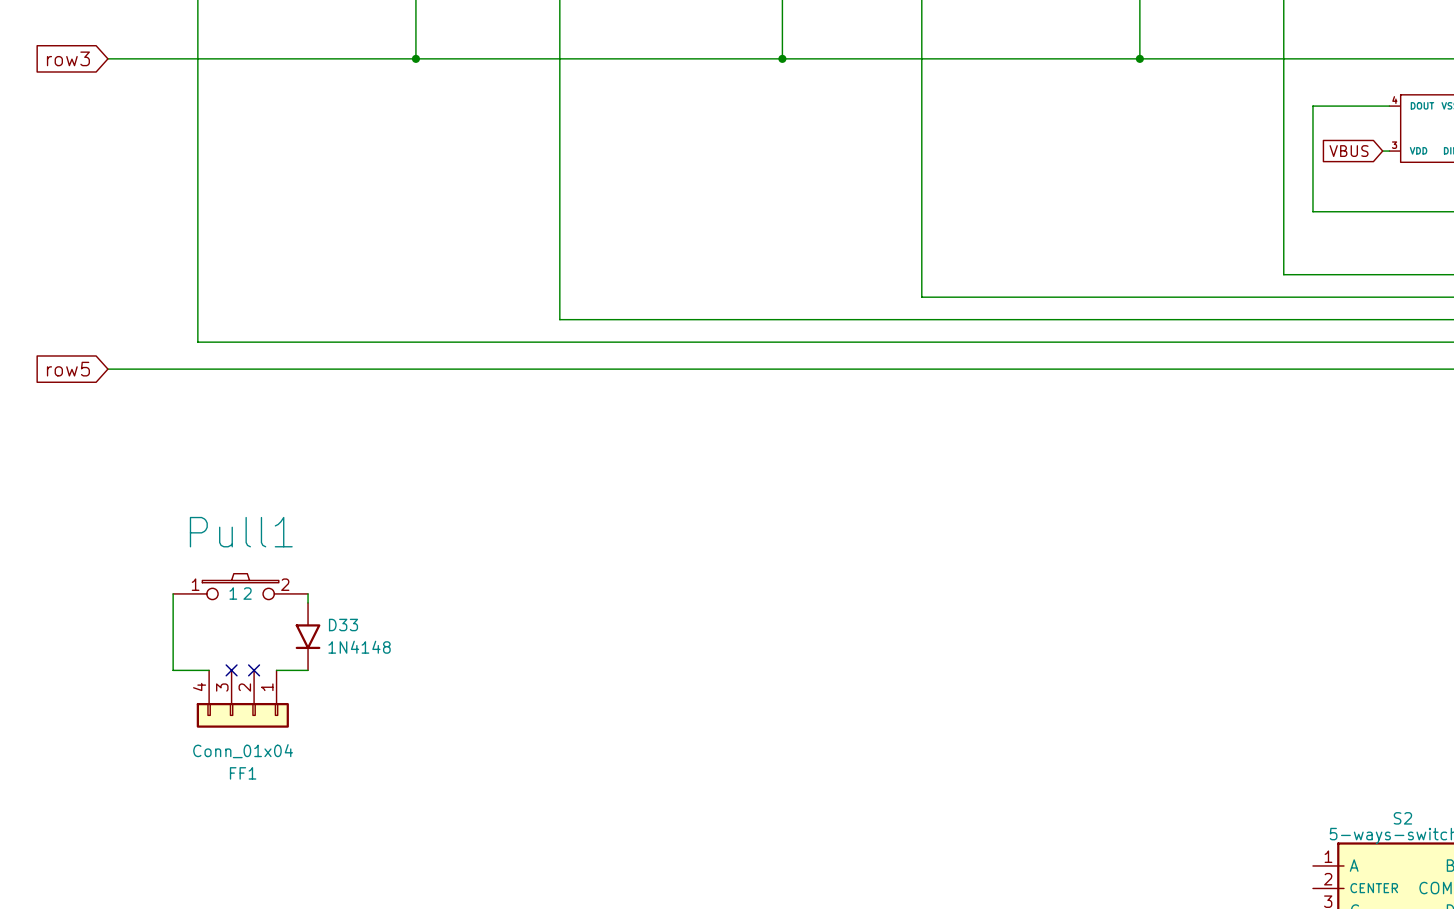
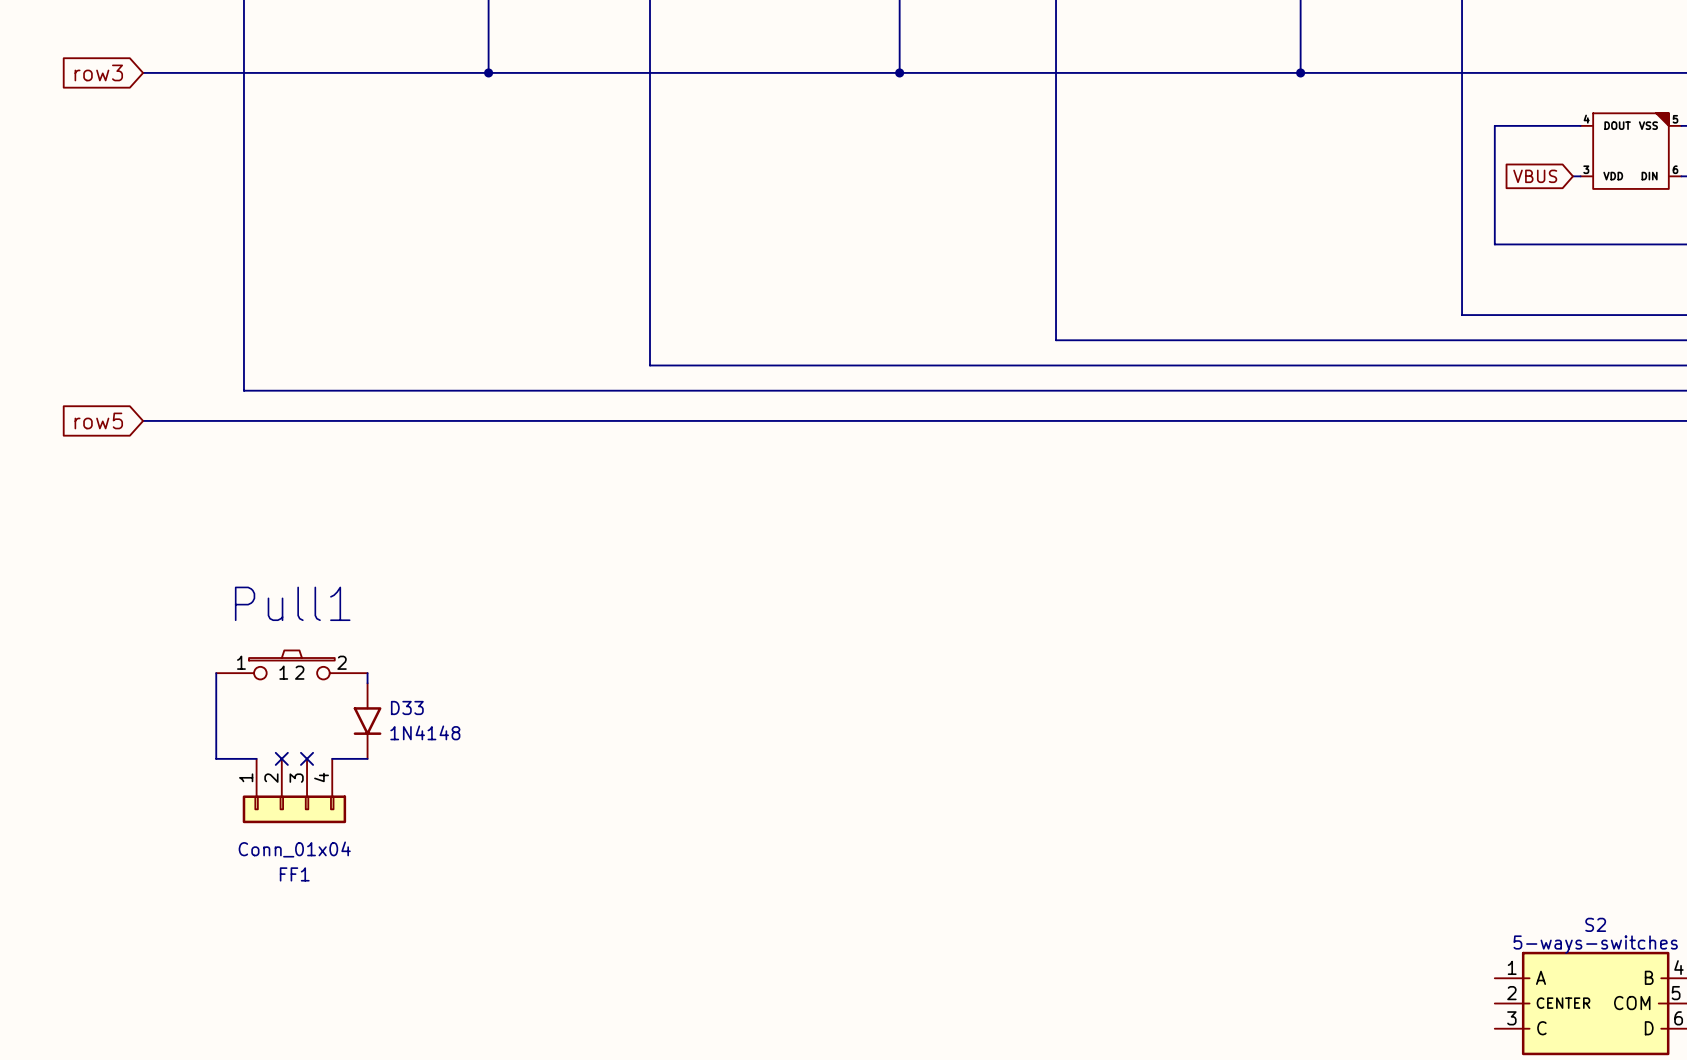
FF1 flip: as is (242, 715) -> left-right (294, 809)

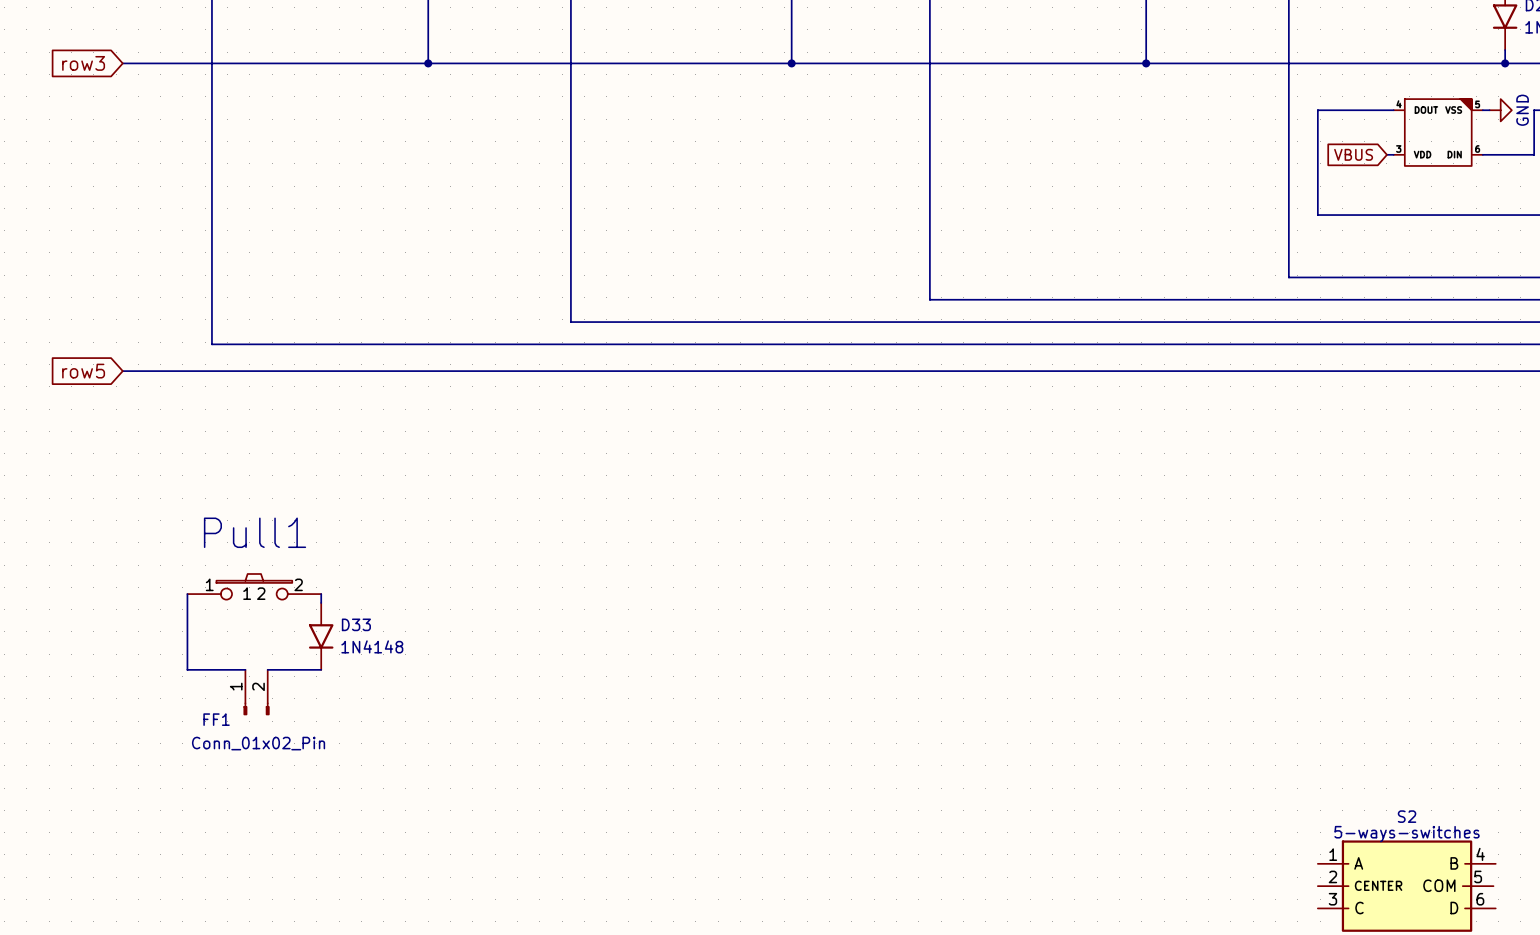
FF1 symbol: [242, 758, 347, 824] -> [243, 669, 270, 716]
wire: none -> (223, 669) (245, 669)
no-connect mark: (281, 758) -> none
wire: none -> (267, 669) (290, 669)
no-connect mark: (307, 758) -> none
FF1 value: Conn_01x04 (294, 849) -> Conn_01x02_Pin (258, 743)
FF1 name position: FF1 (294, 874) -> FF1 (216, 719)

